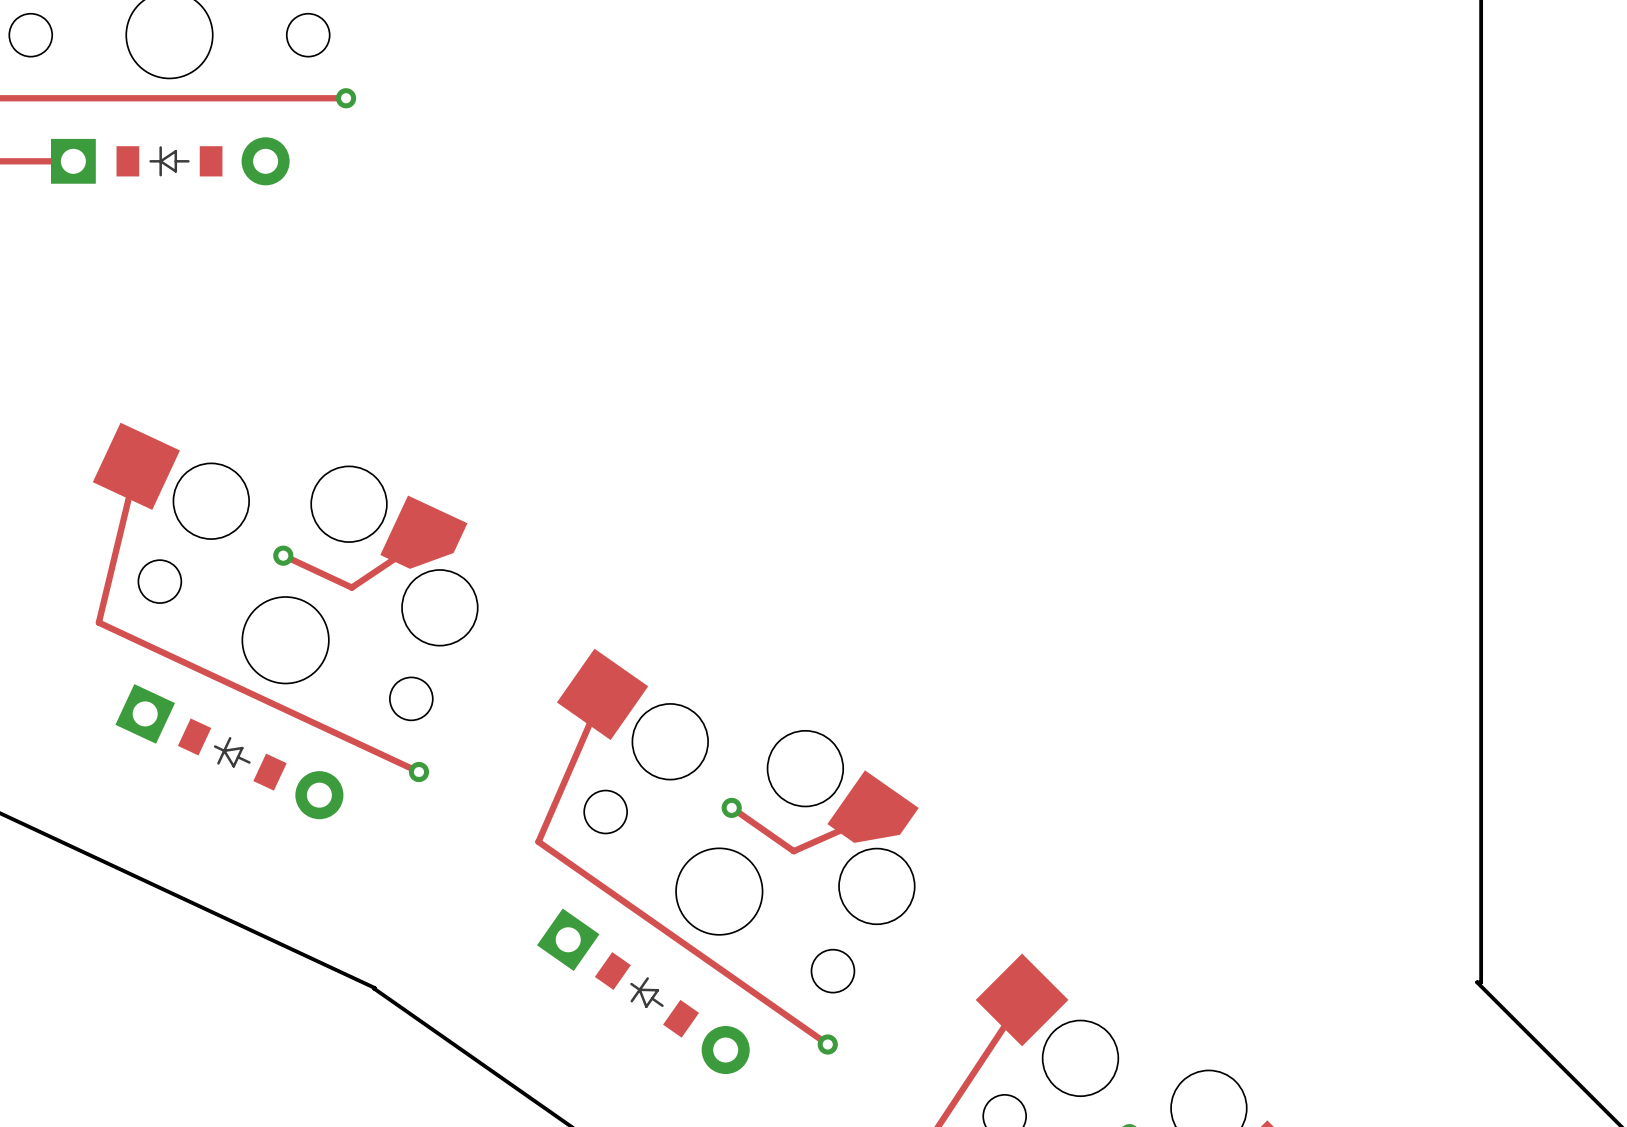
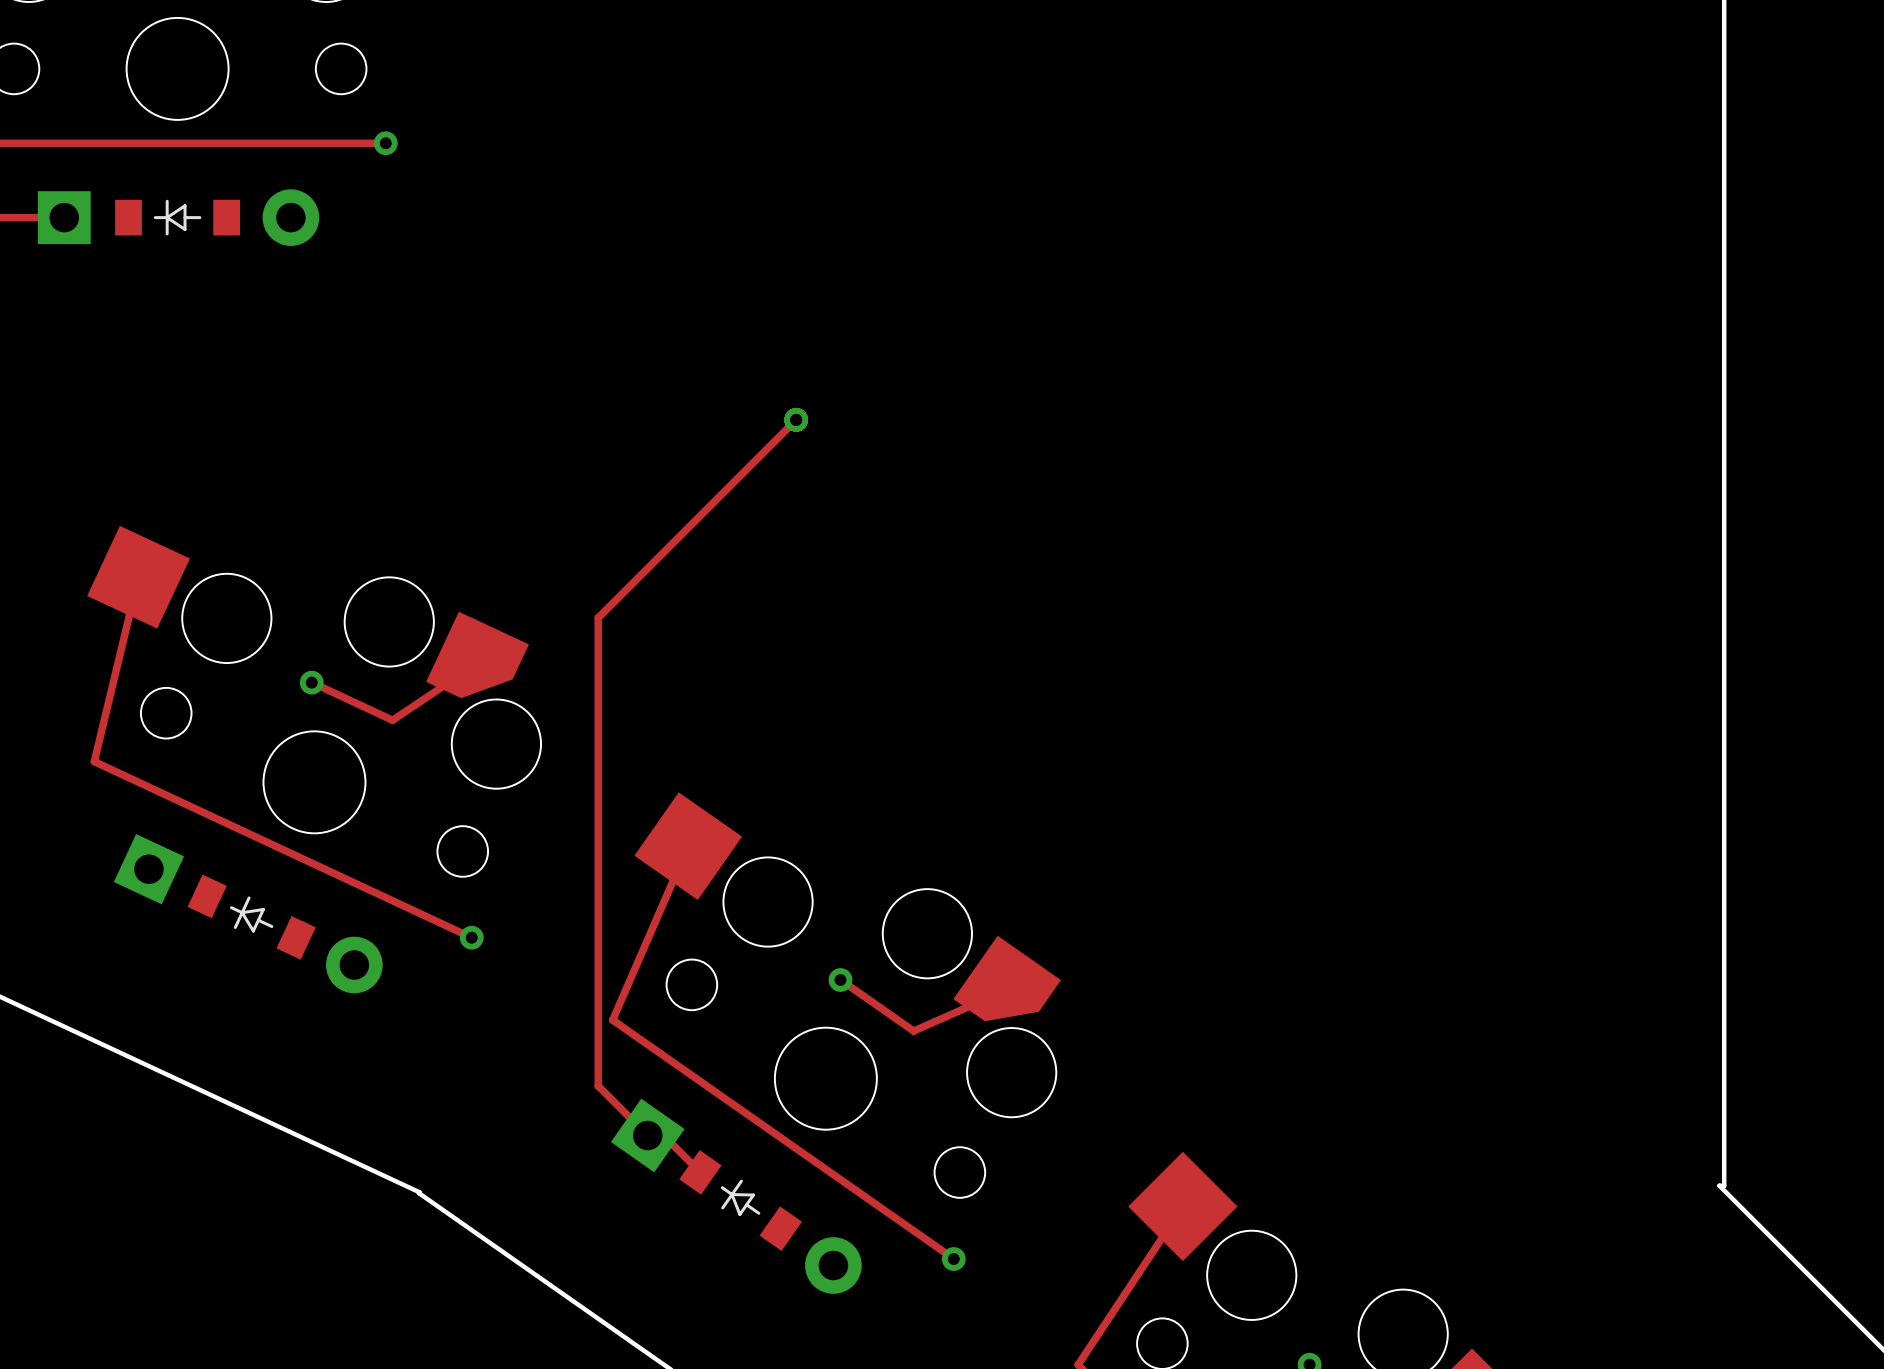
track: none -> (796, 419) (598, 617) (598, 1085) (647, 1135) (663, 1135) (700, 1172)
via: none -> (796, 419)

